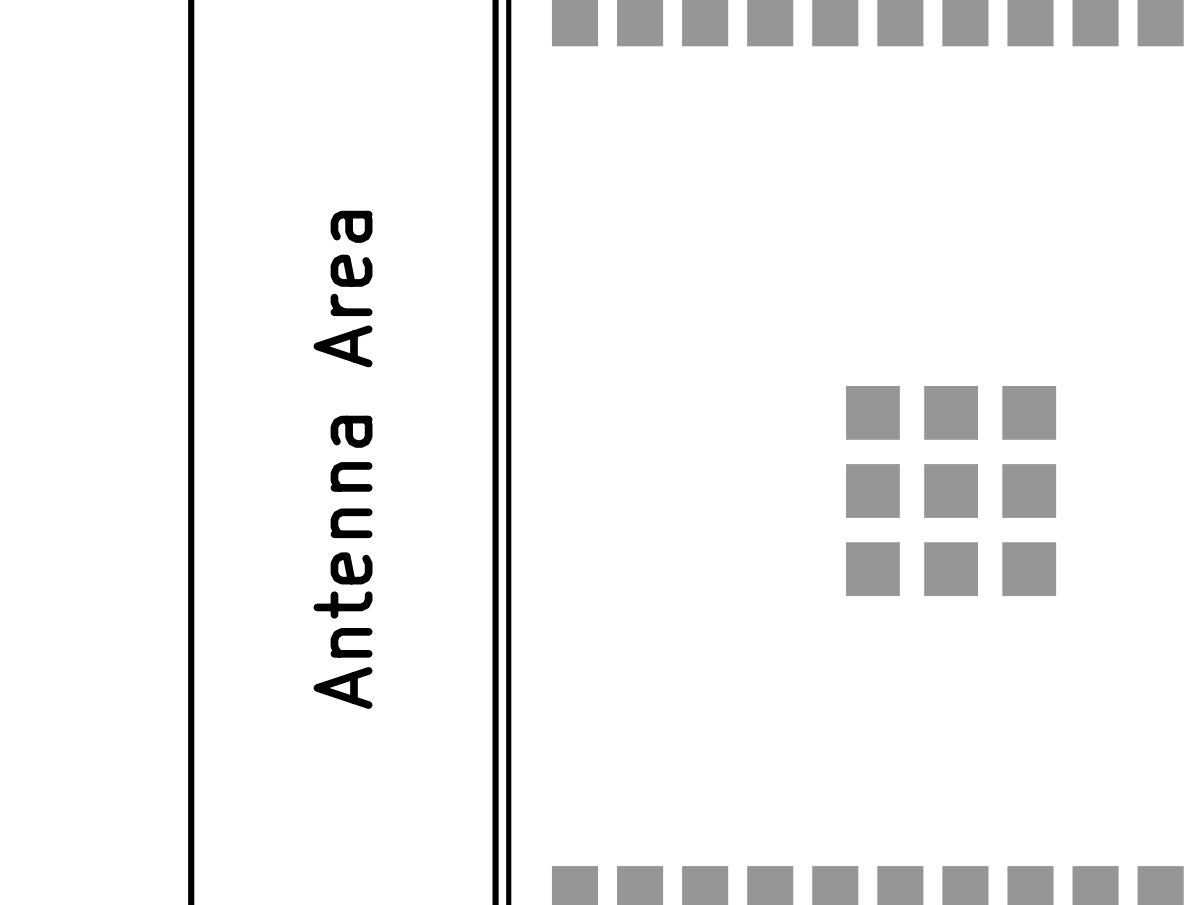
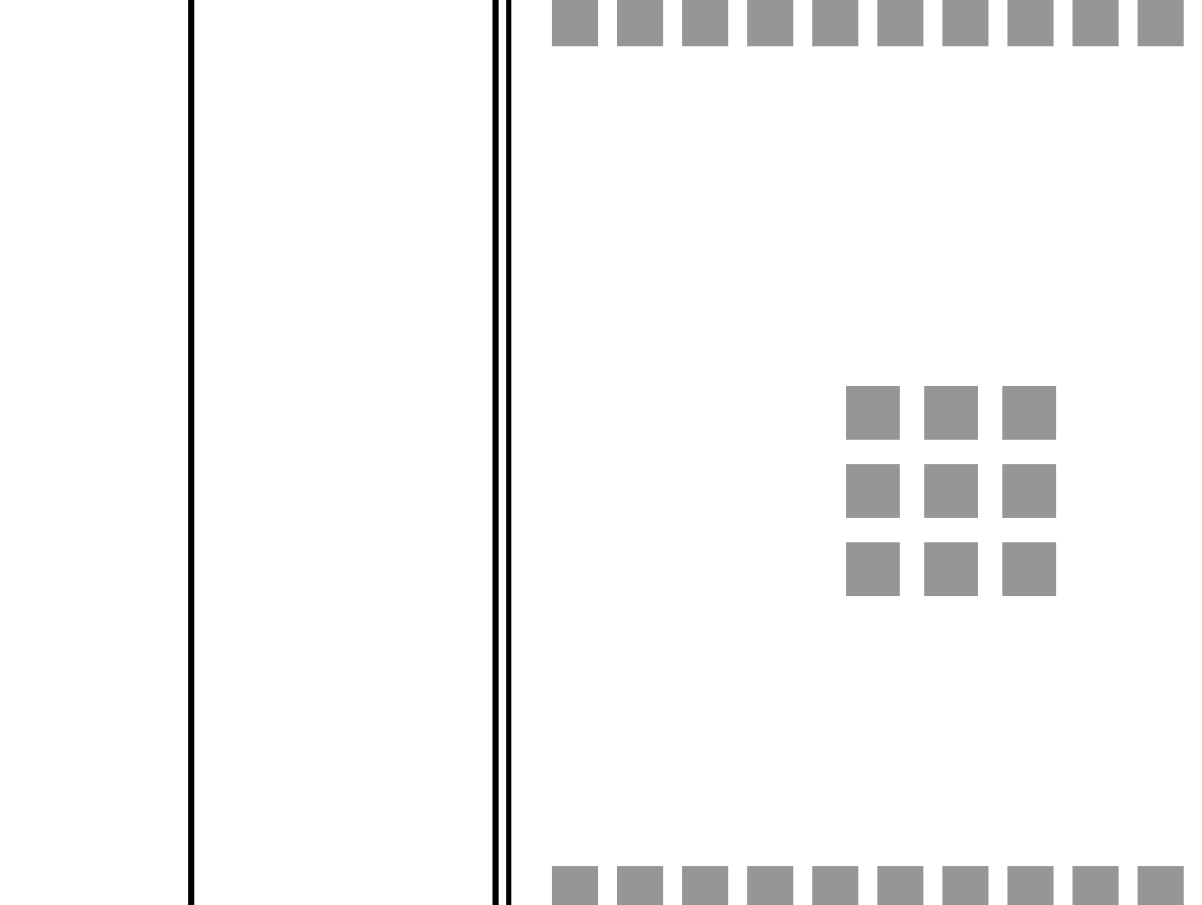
part text: Antenna Area (343, 459) -> none

